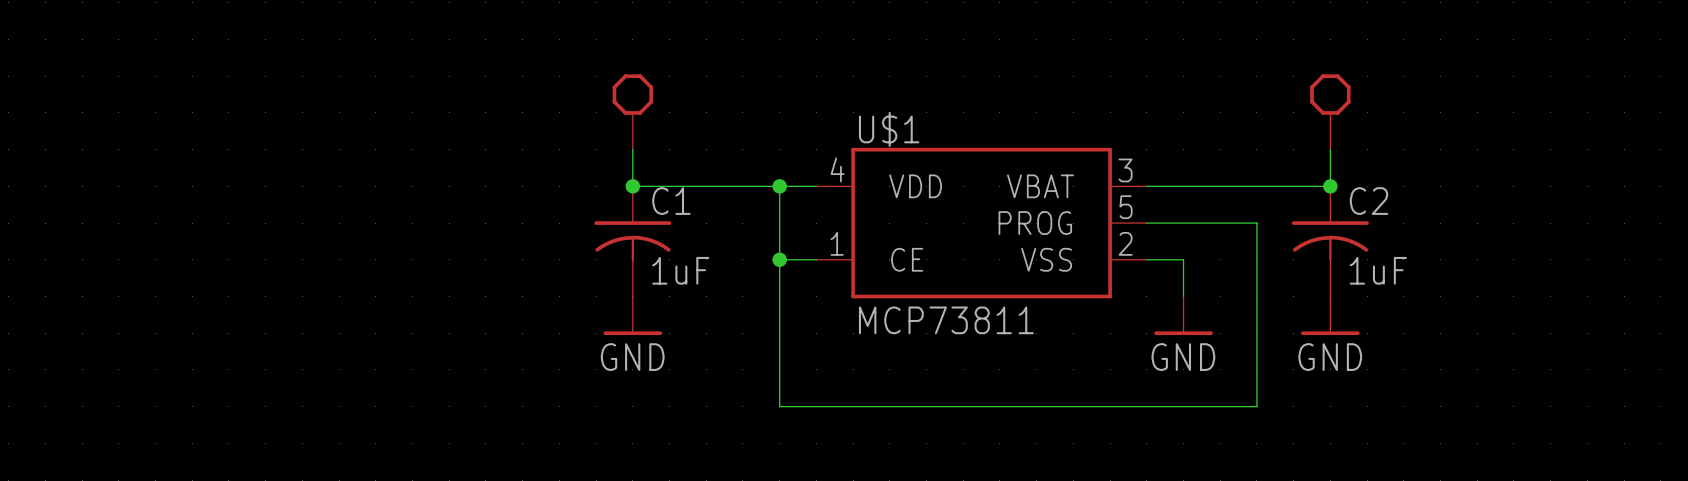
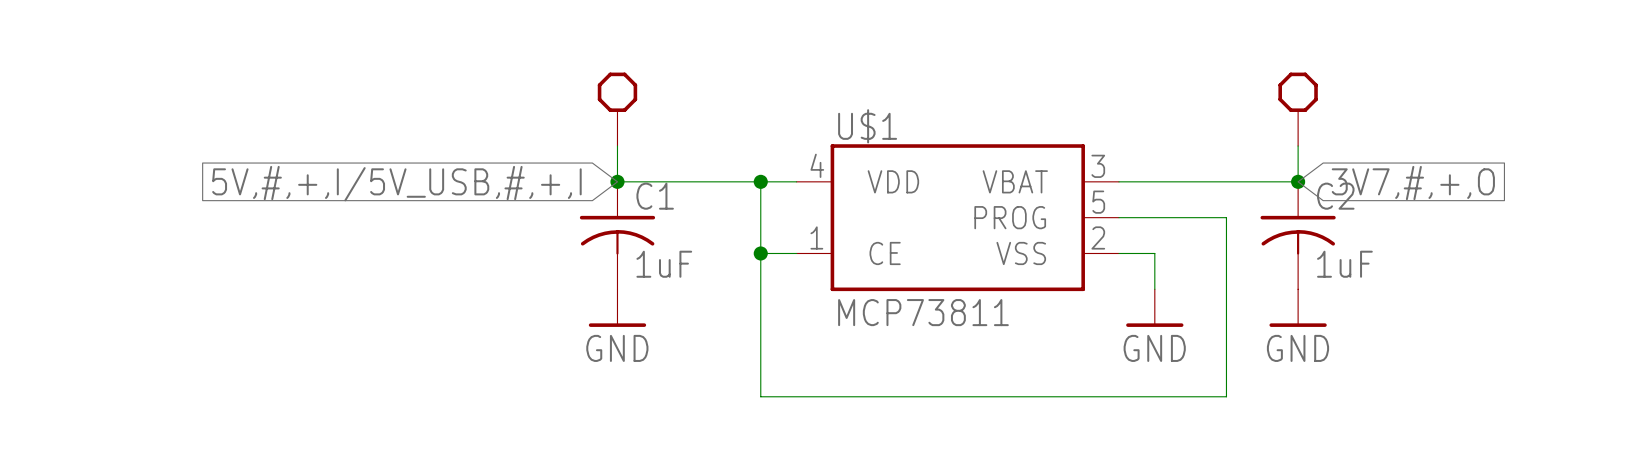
global label: none -> 3V7,#,+,O (1413, 183)
global label: none -> 5V,#,+,I/5V_USB,#,+,I (396, 183)

